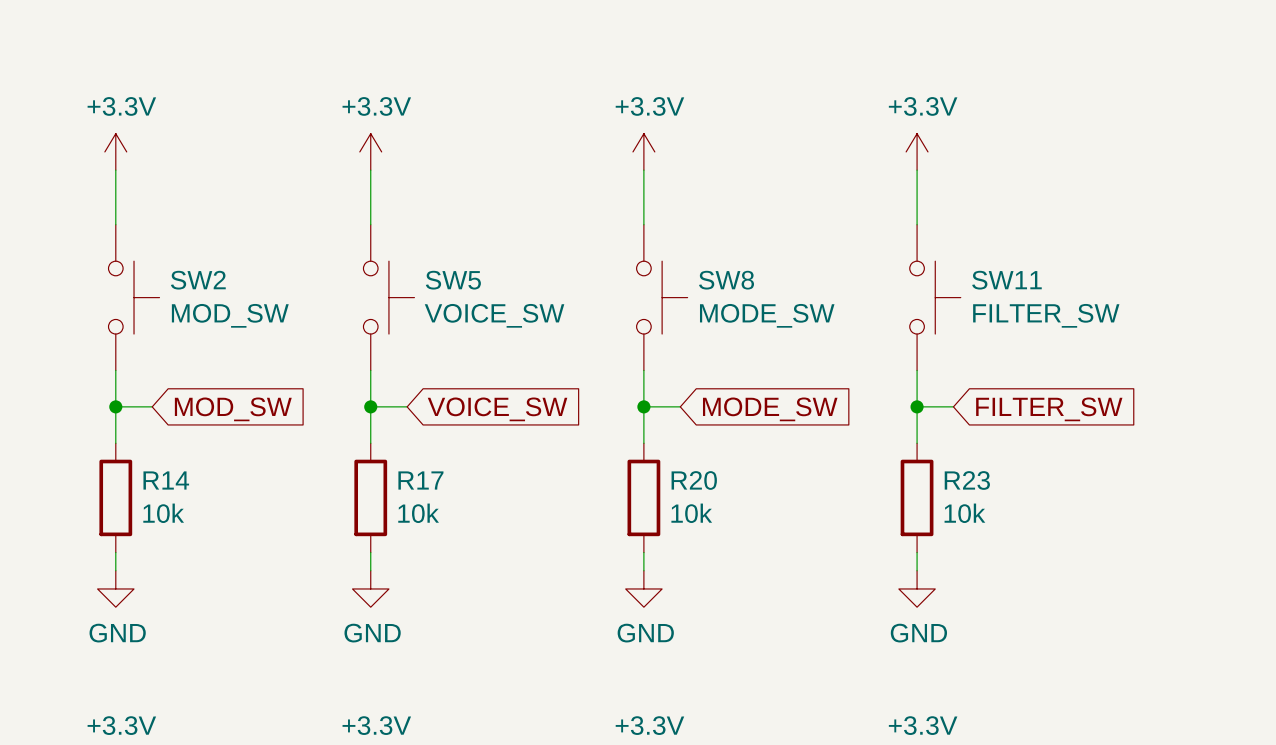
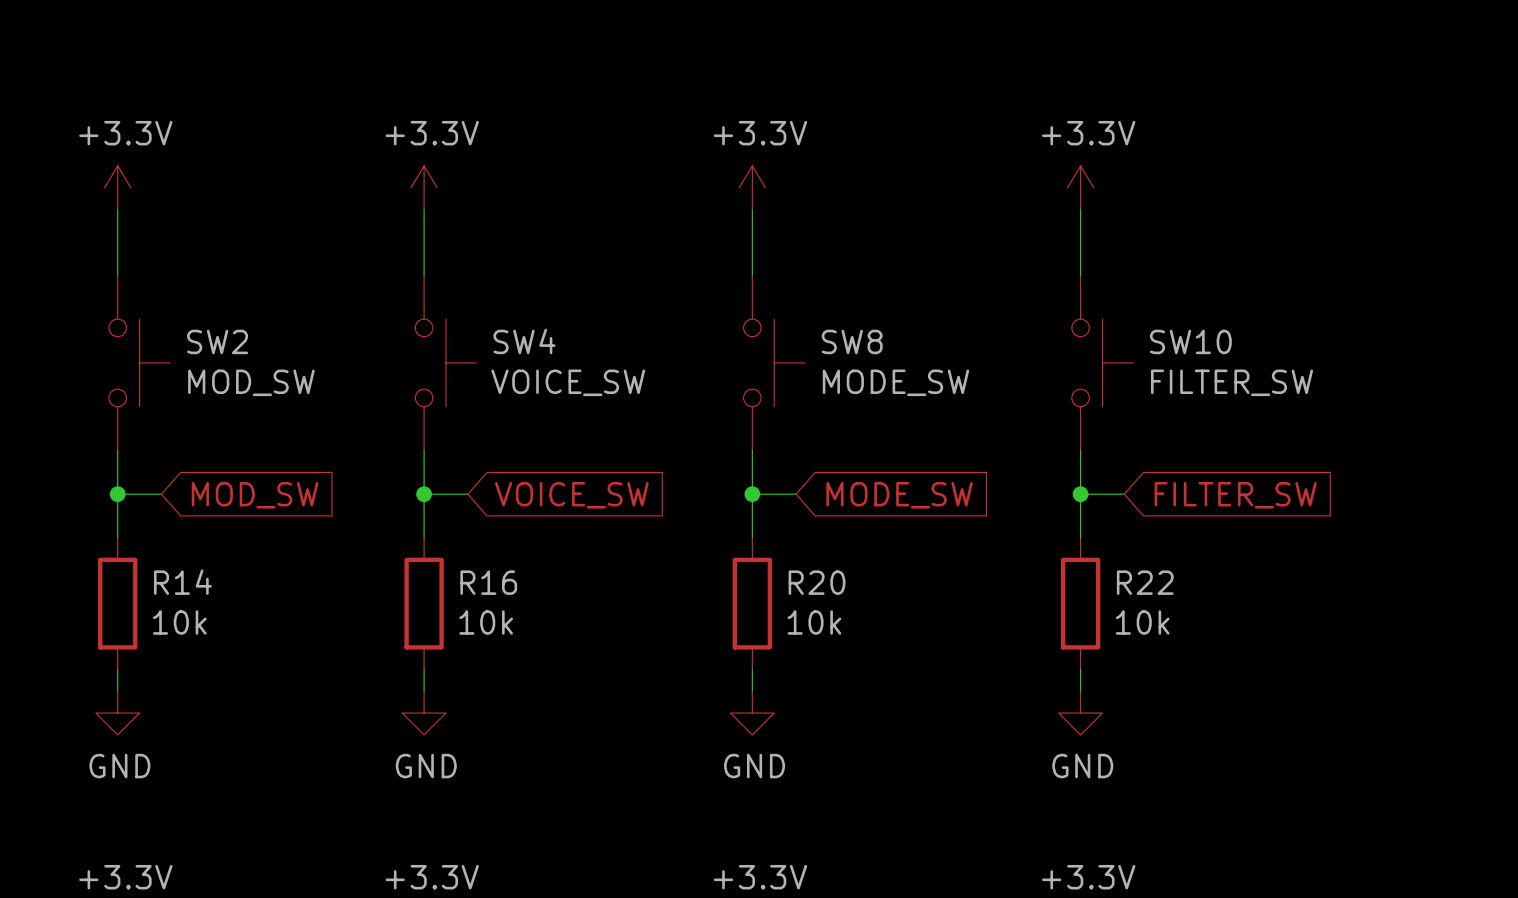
SW5 name: SW5 (453, 280) -> SW4 (524, 341)
SW11 name: SW11 (1006, 280) -> SW10 (1190, 341)
R17 name: R17 (420, 480) -> R16 (488, 582)
R23 name: R23 (967, 480) -> R22 (1145, 582)

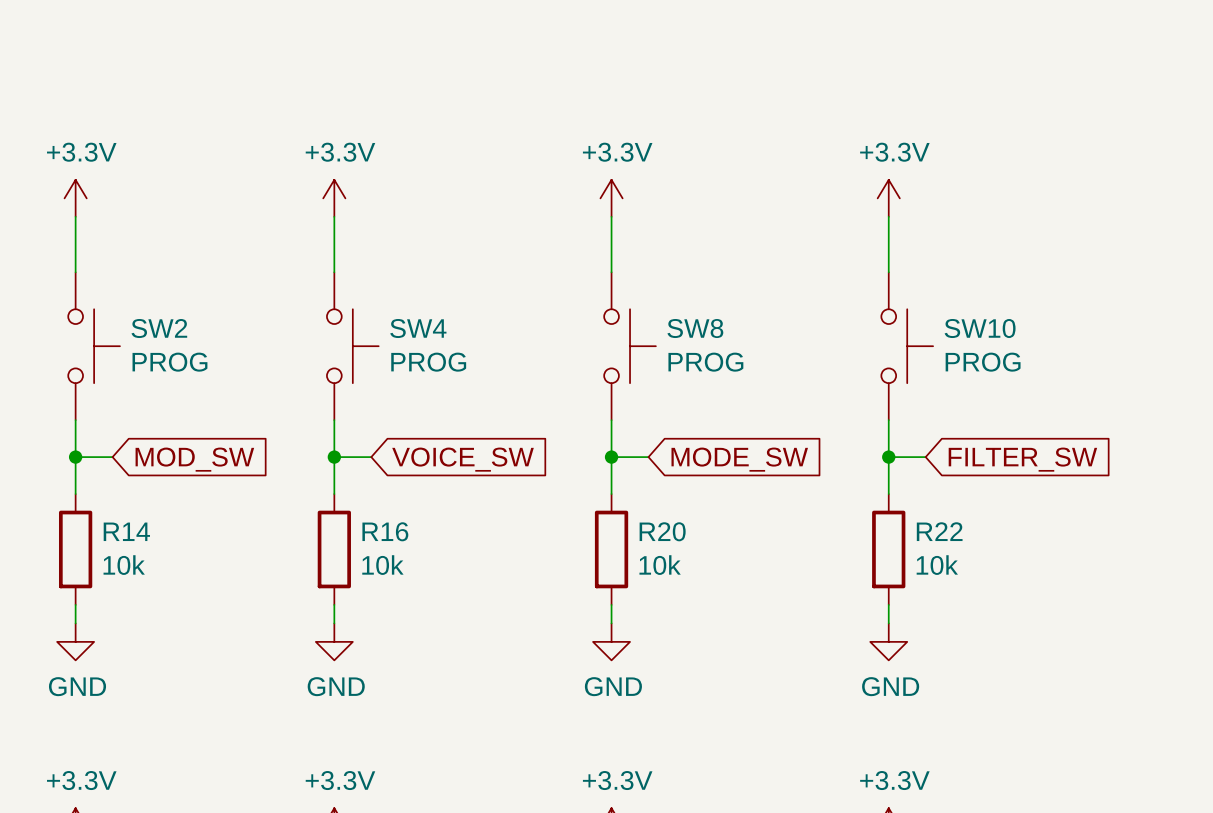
SW2 value: MOD_SW (251, 382) -> PROG (169, 362)
SW4 value: VOICE_SW (568, 382) -> PROG (428, 362)
SW8 value: MODE_SW (895, 382) -> PROG (705, 362)
SW10 value: FILTER_SW (1232, 382) -> PROG (983, 362)

